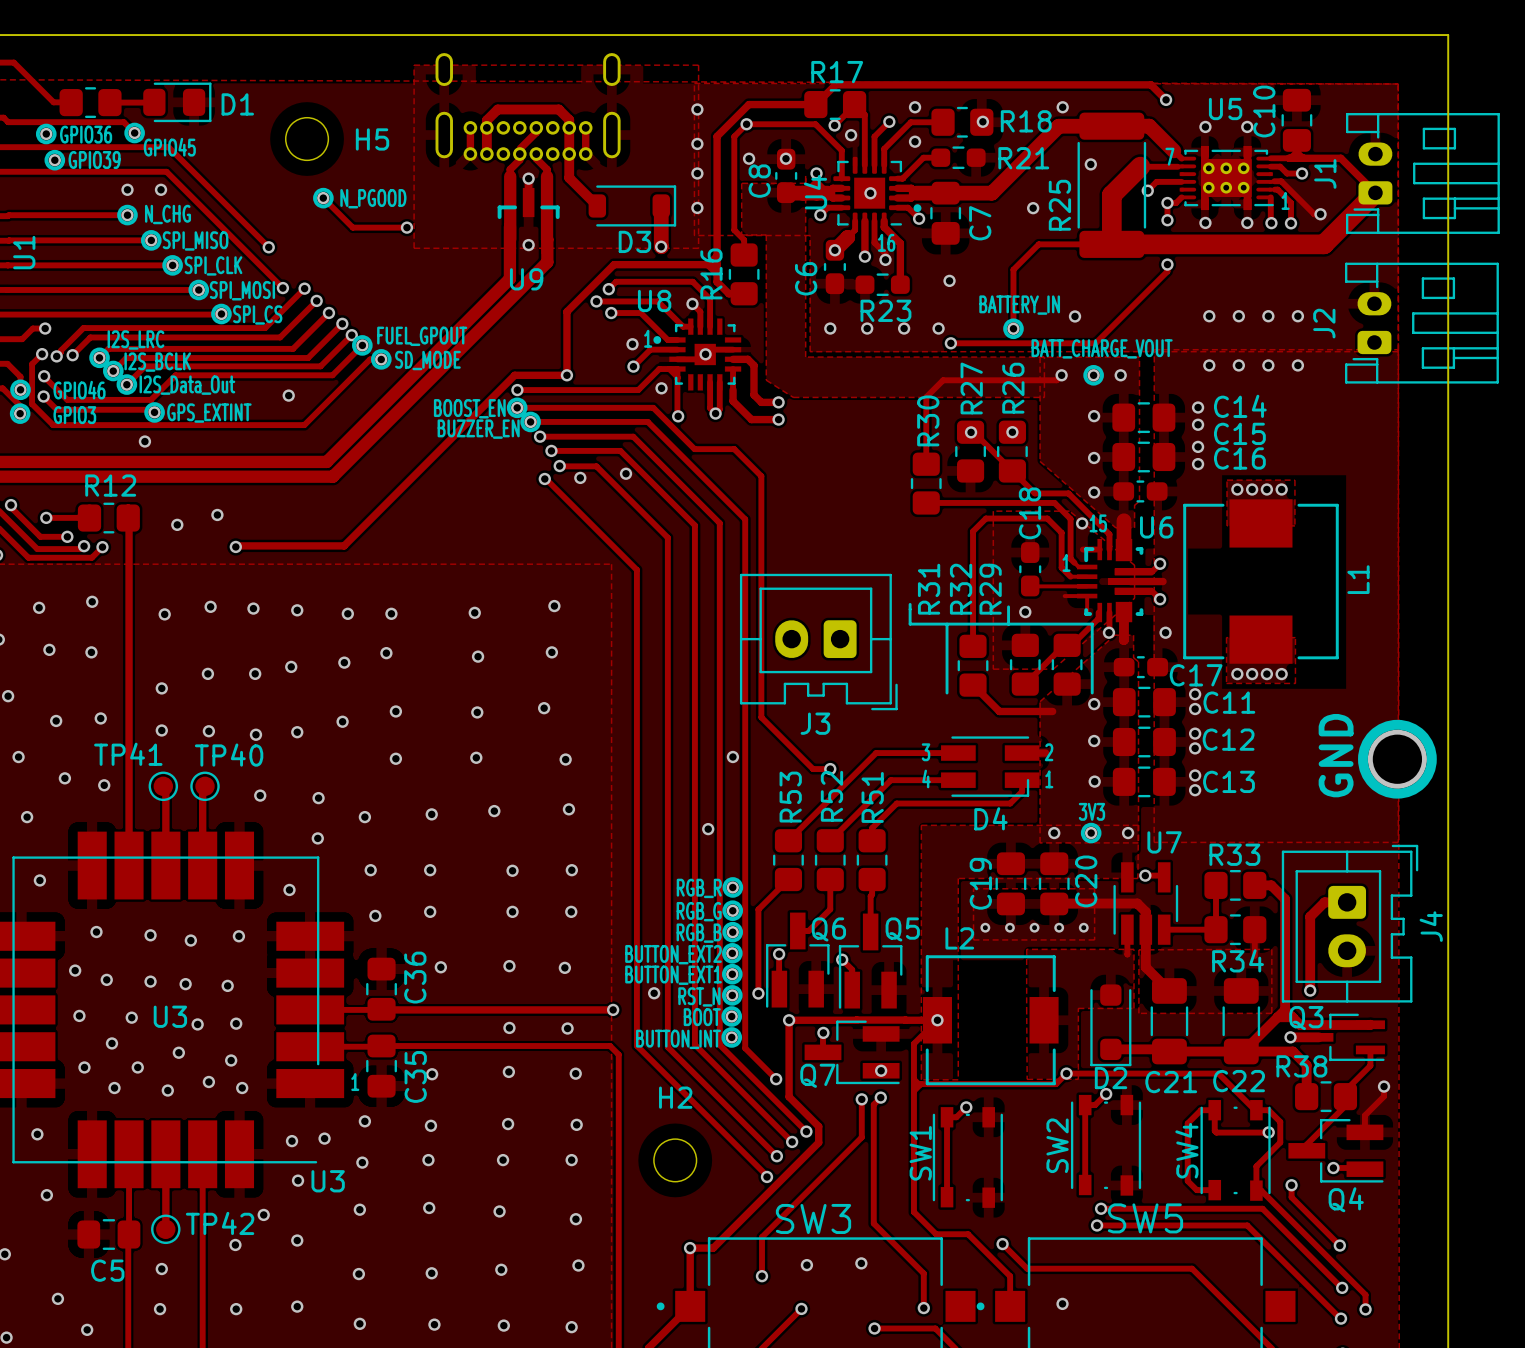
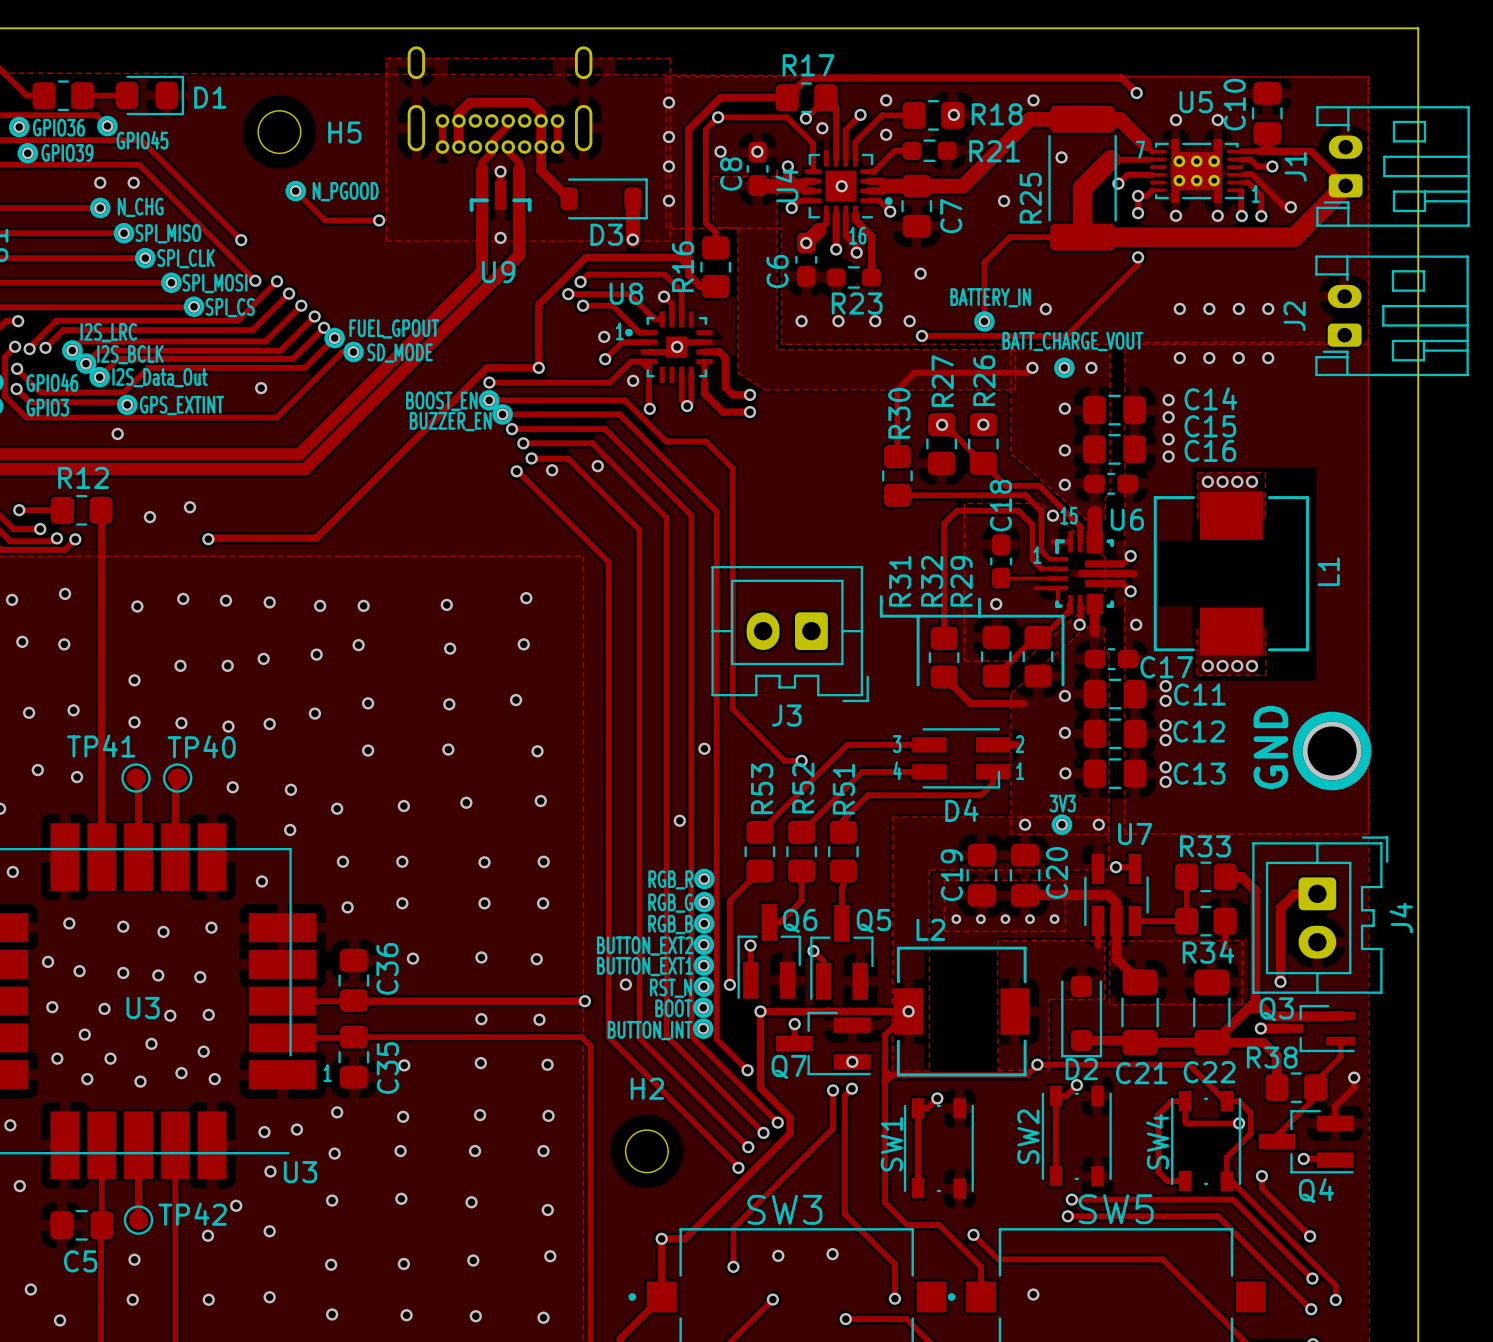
text position: GND (1336, 755) -> GND (1270, 747)
drawing position: (1397, 759) -> (1332, 751)
via position: (1397, 759) -> (1332, 751)

